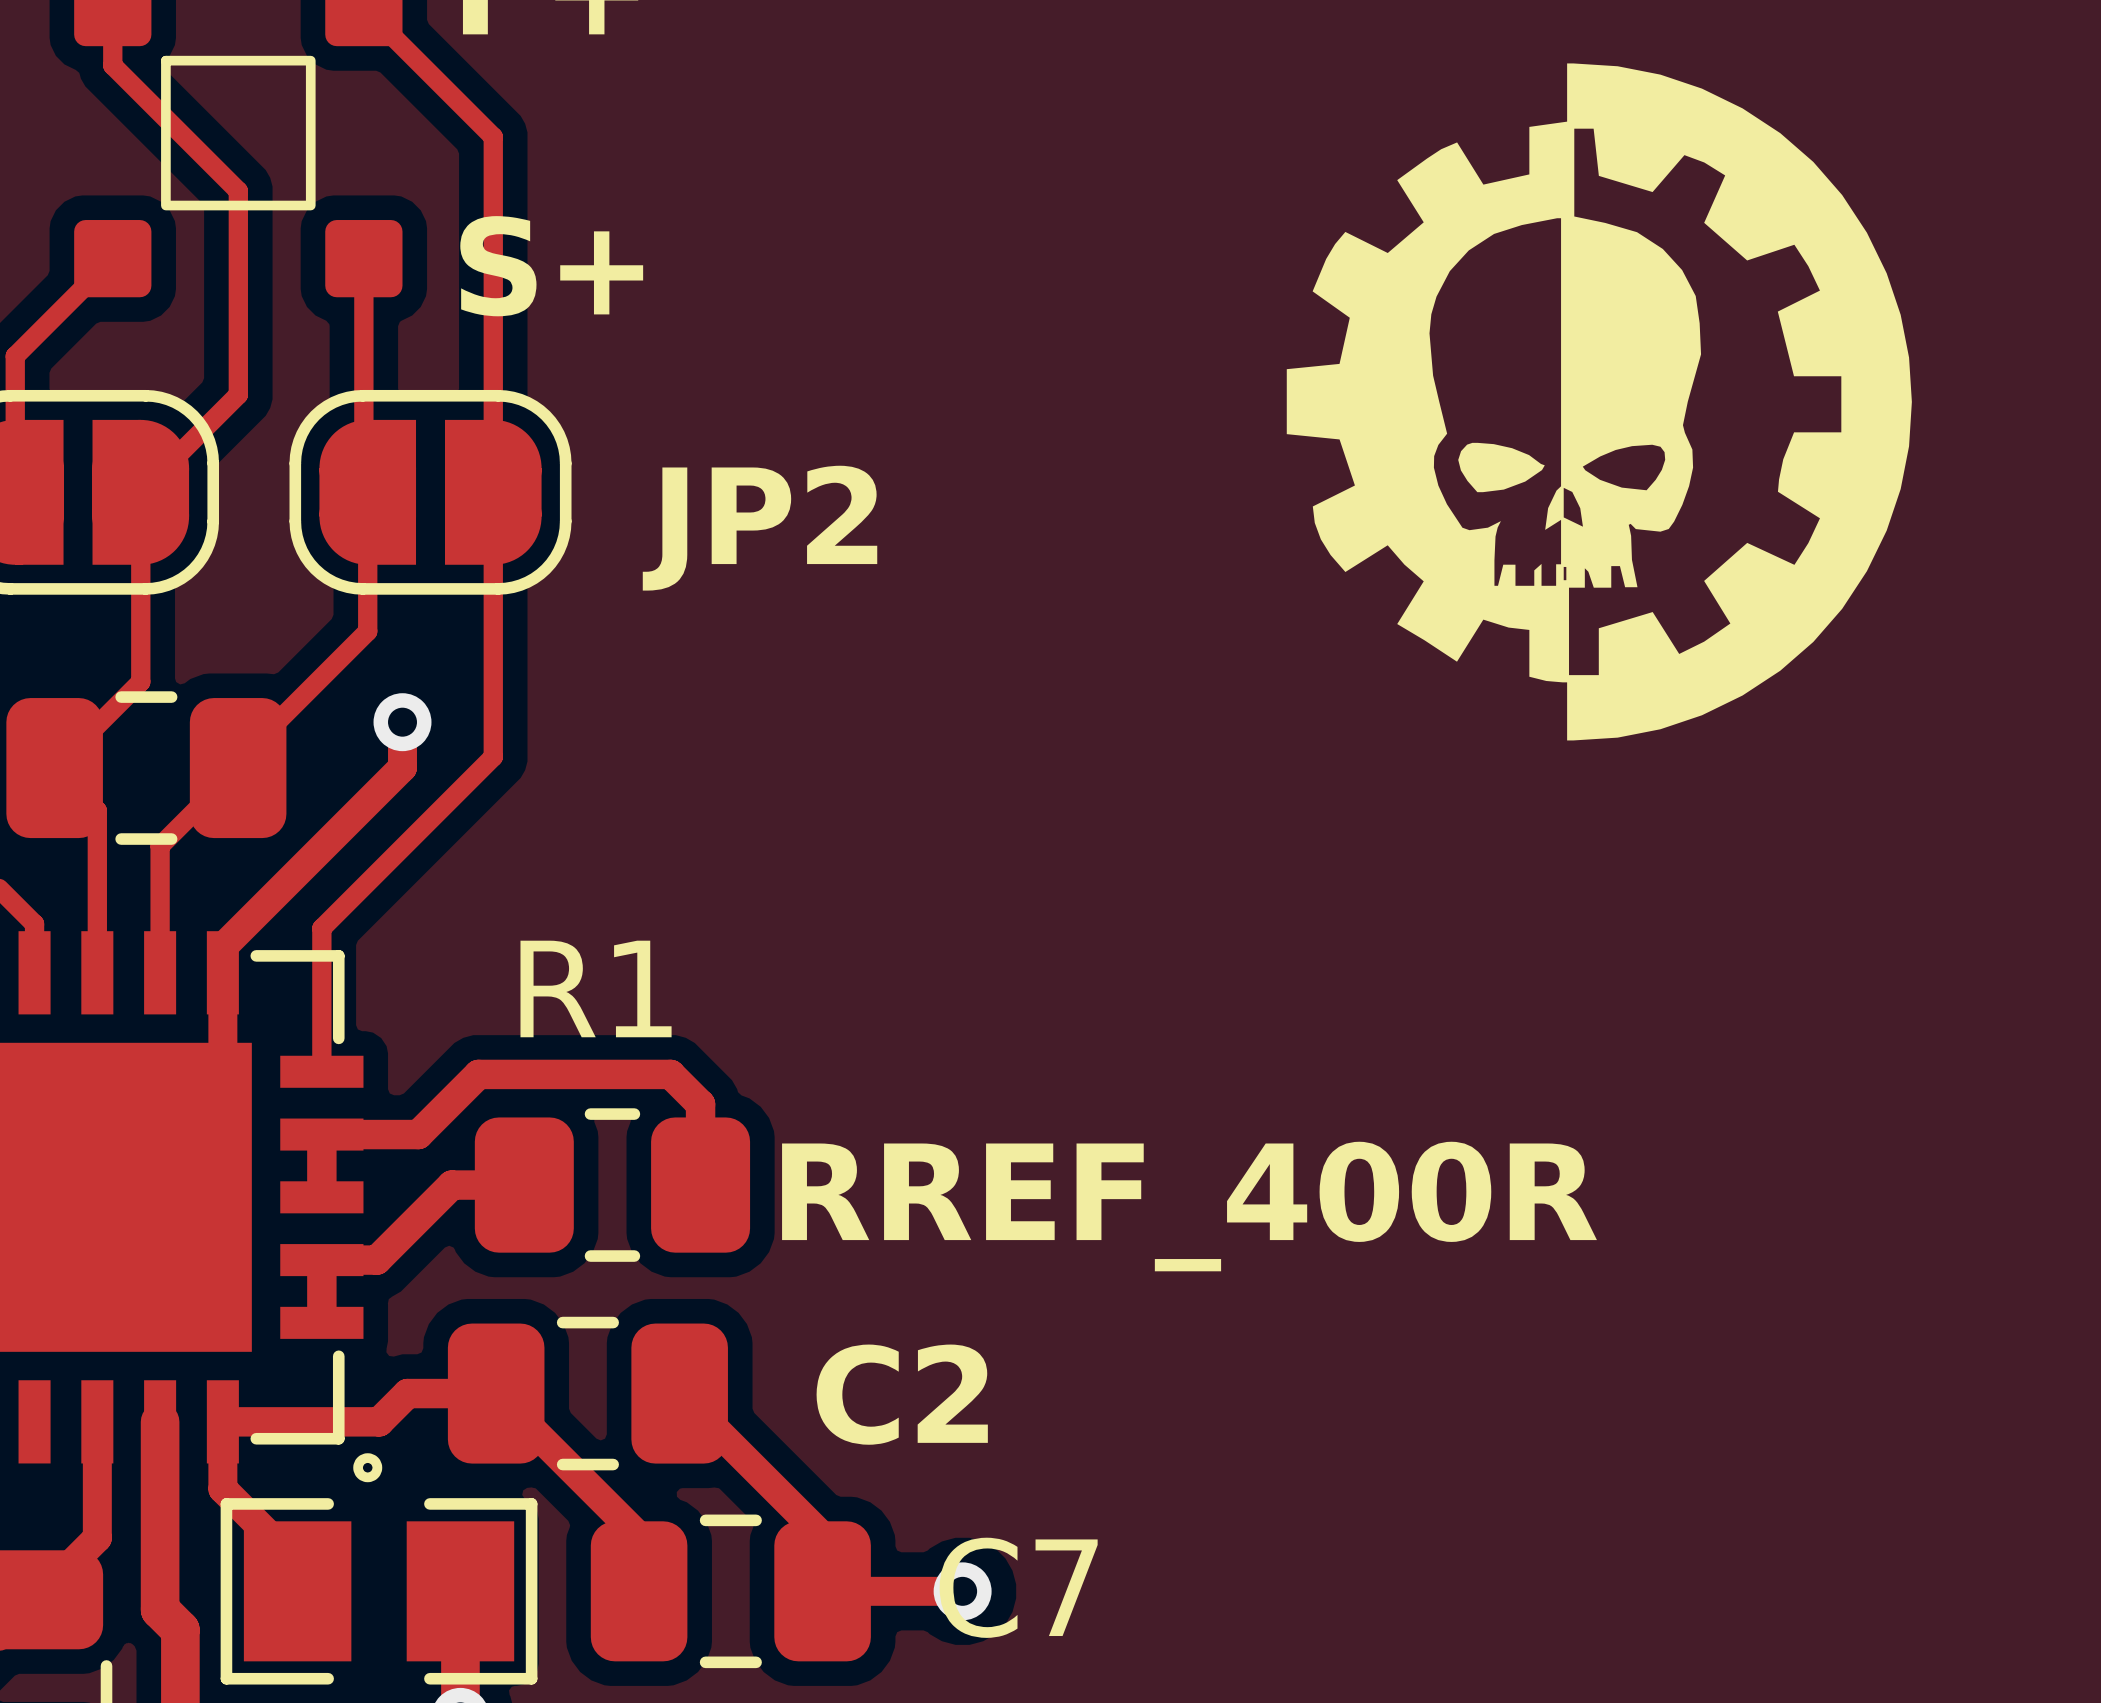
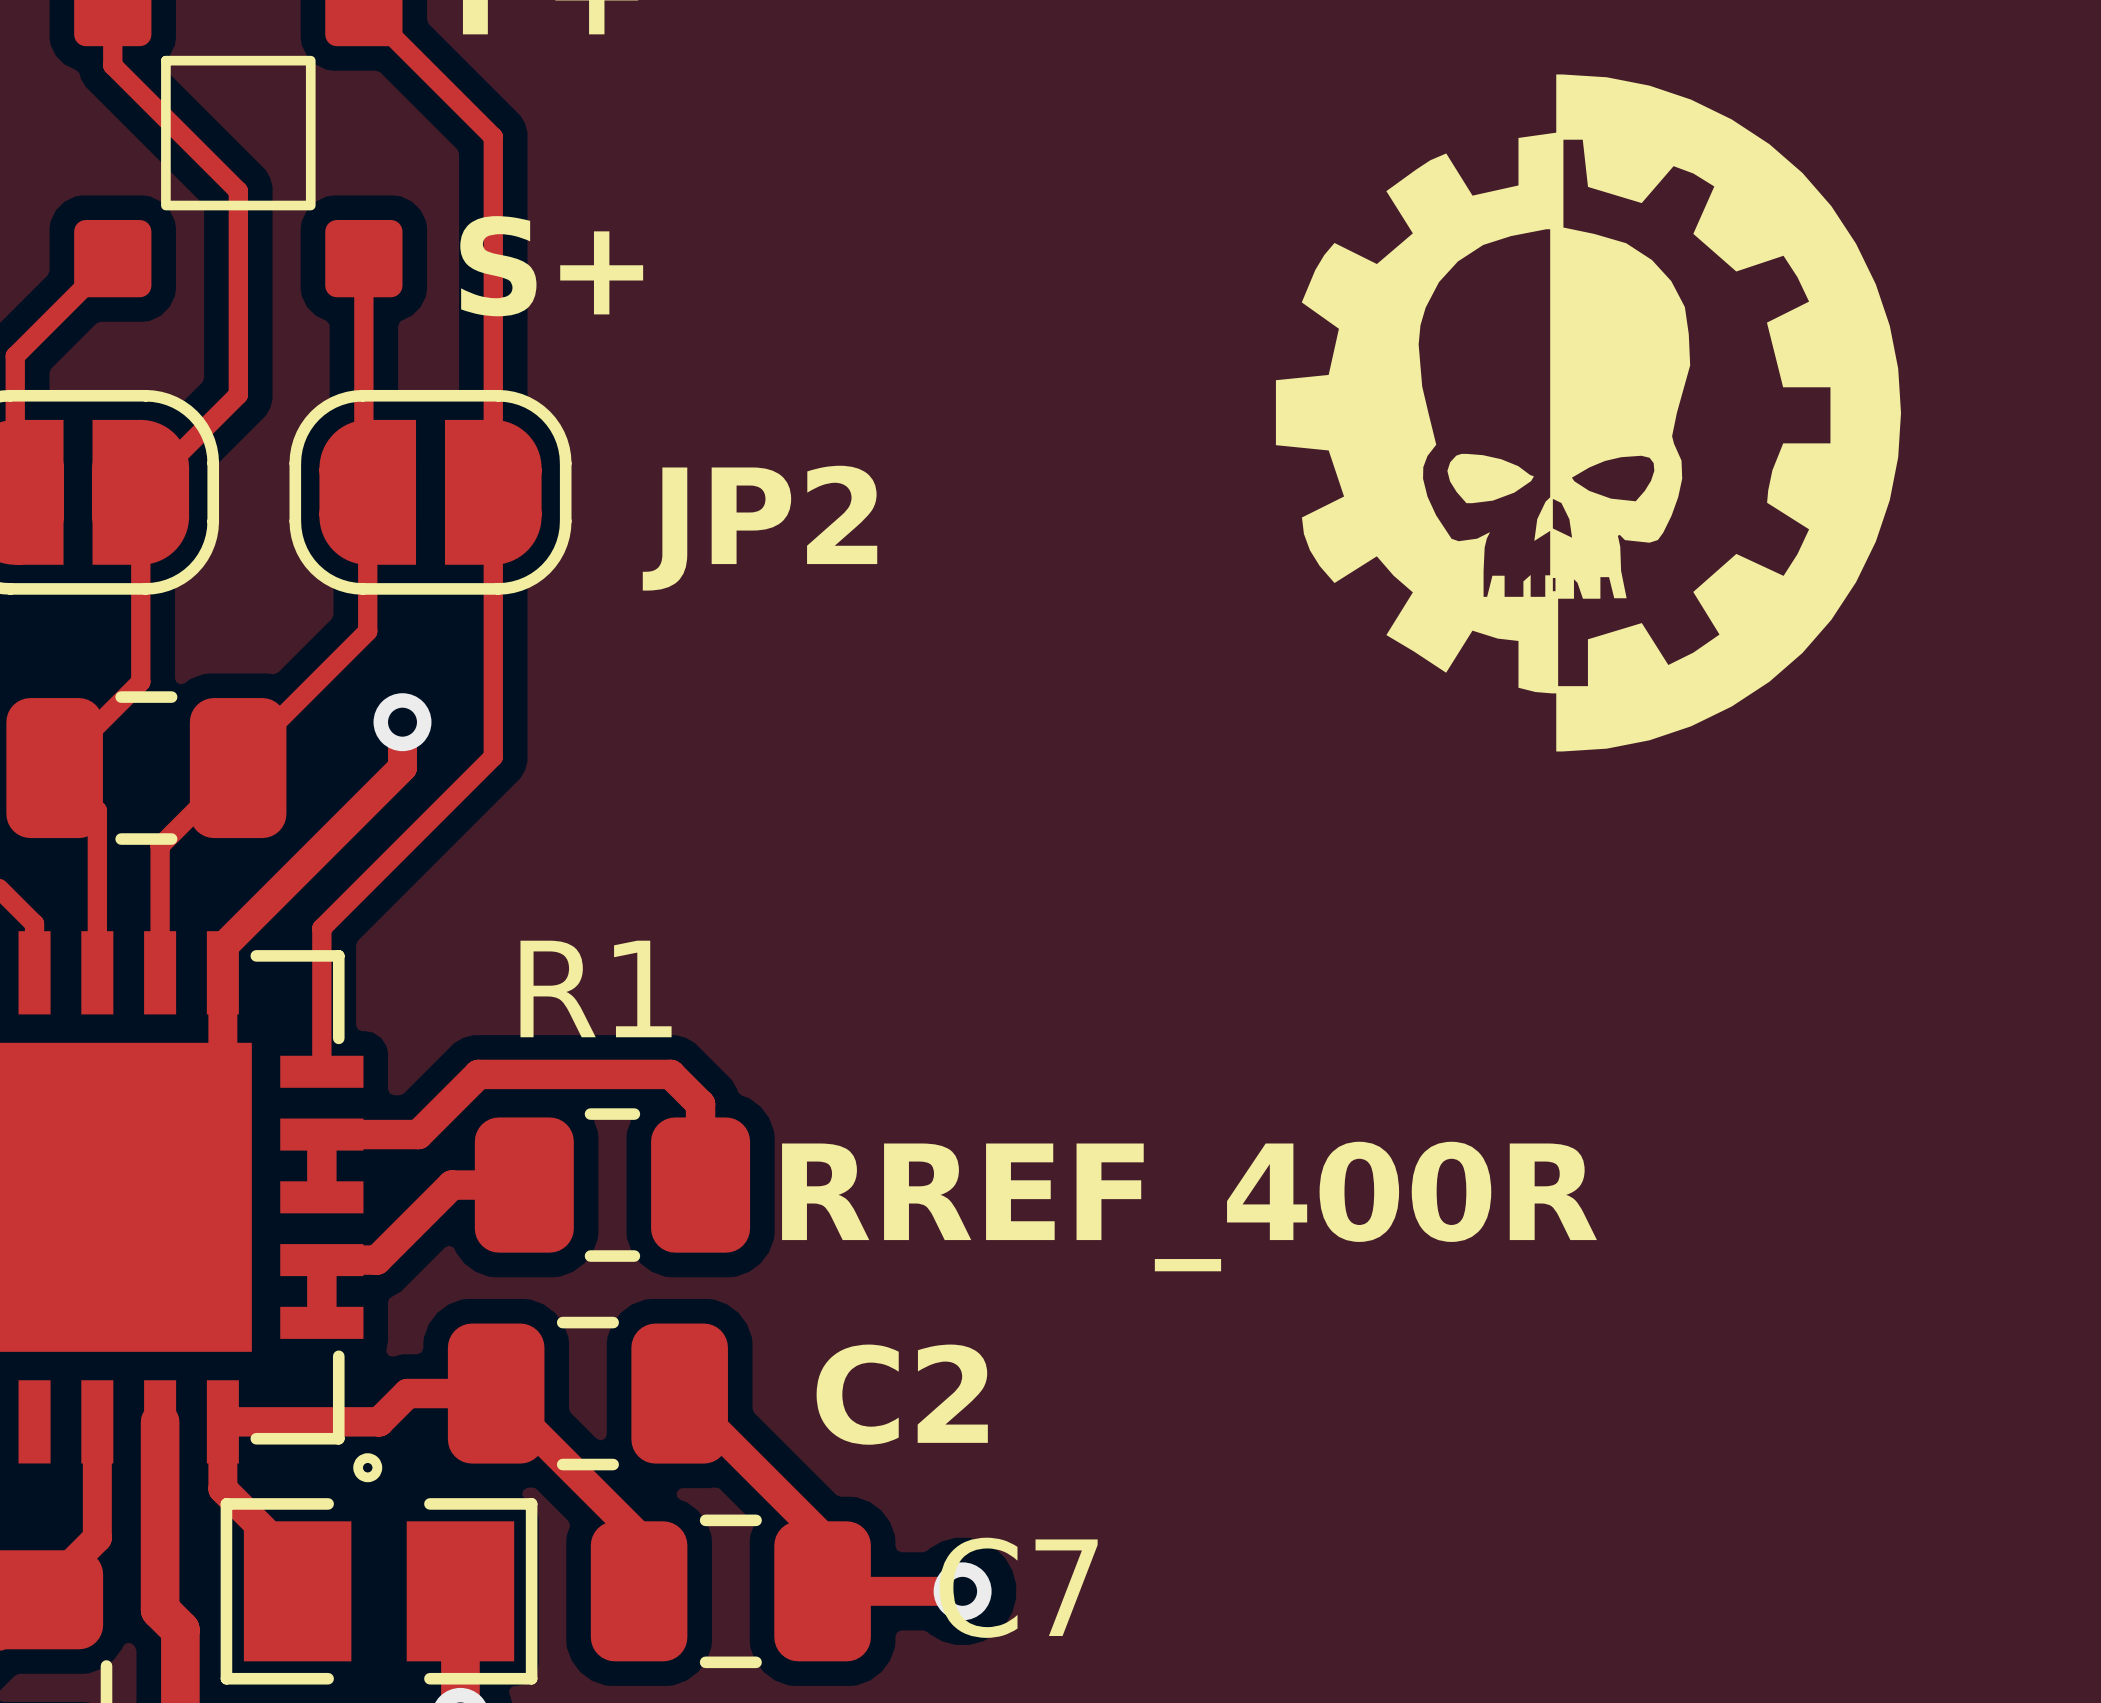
drawing position: (1599, 401) -> (1588, 412)
drawing position: (1501, 467) -> (1490, 478)

